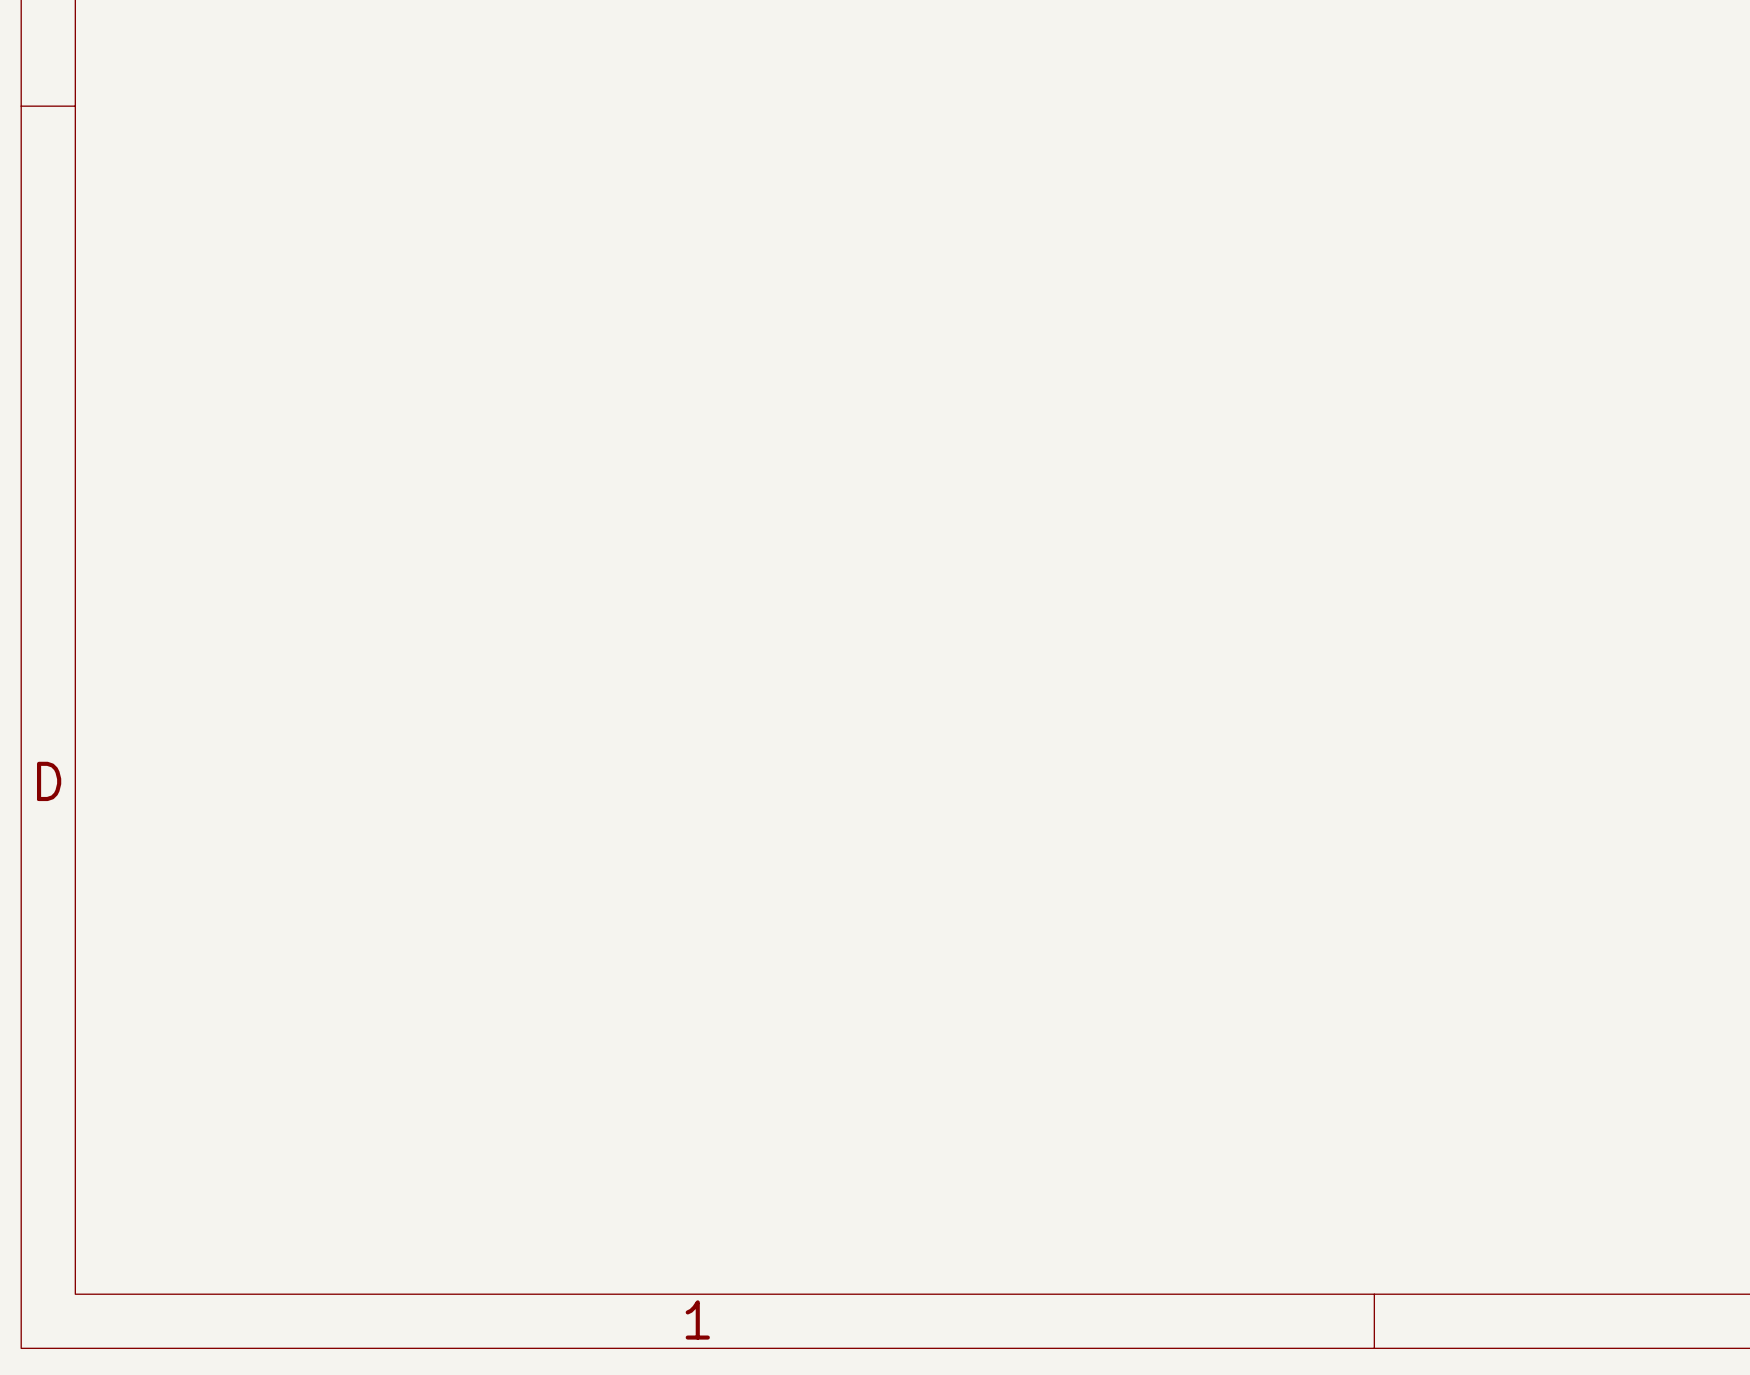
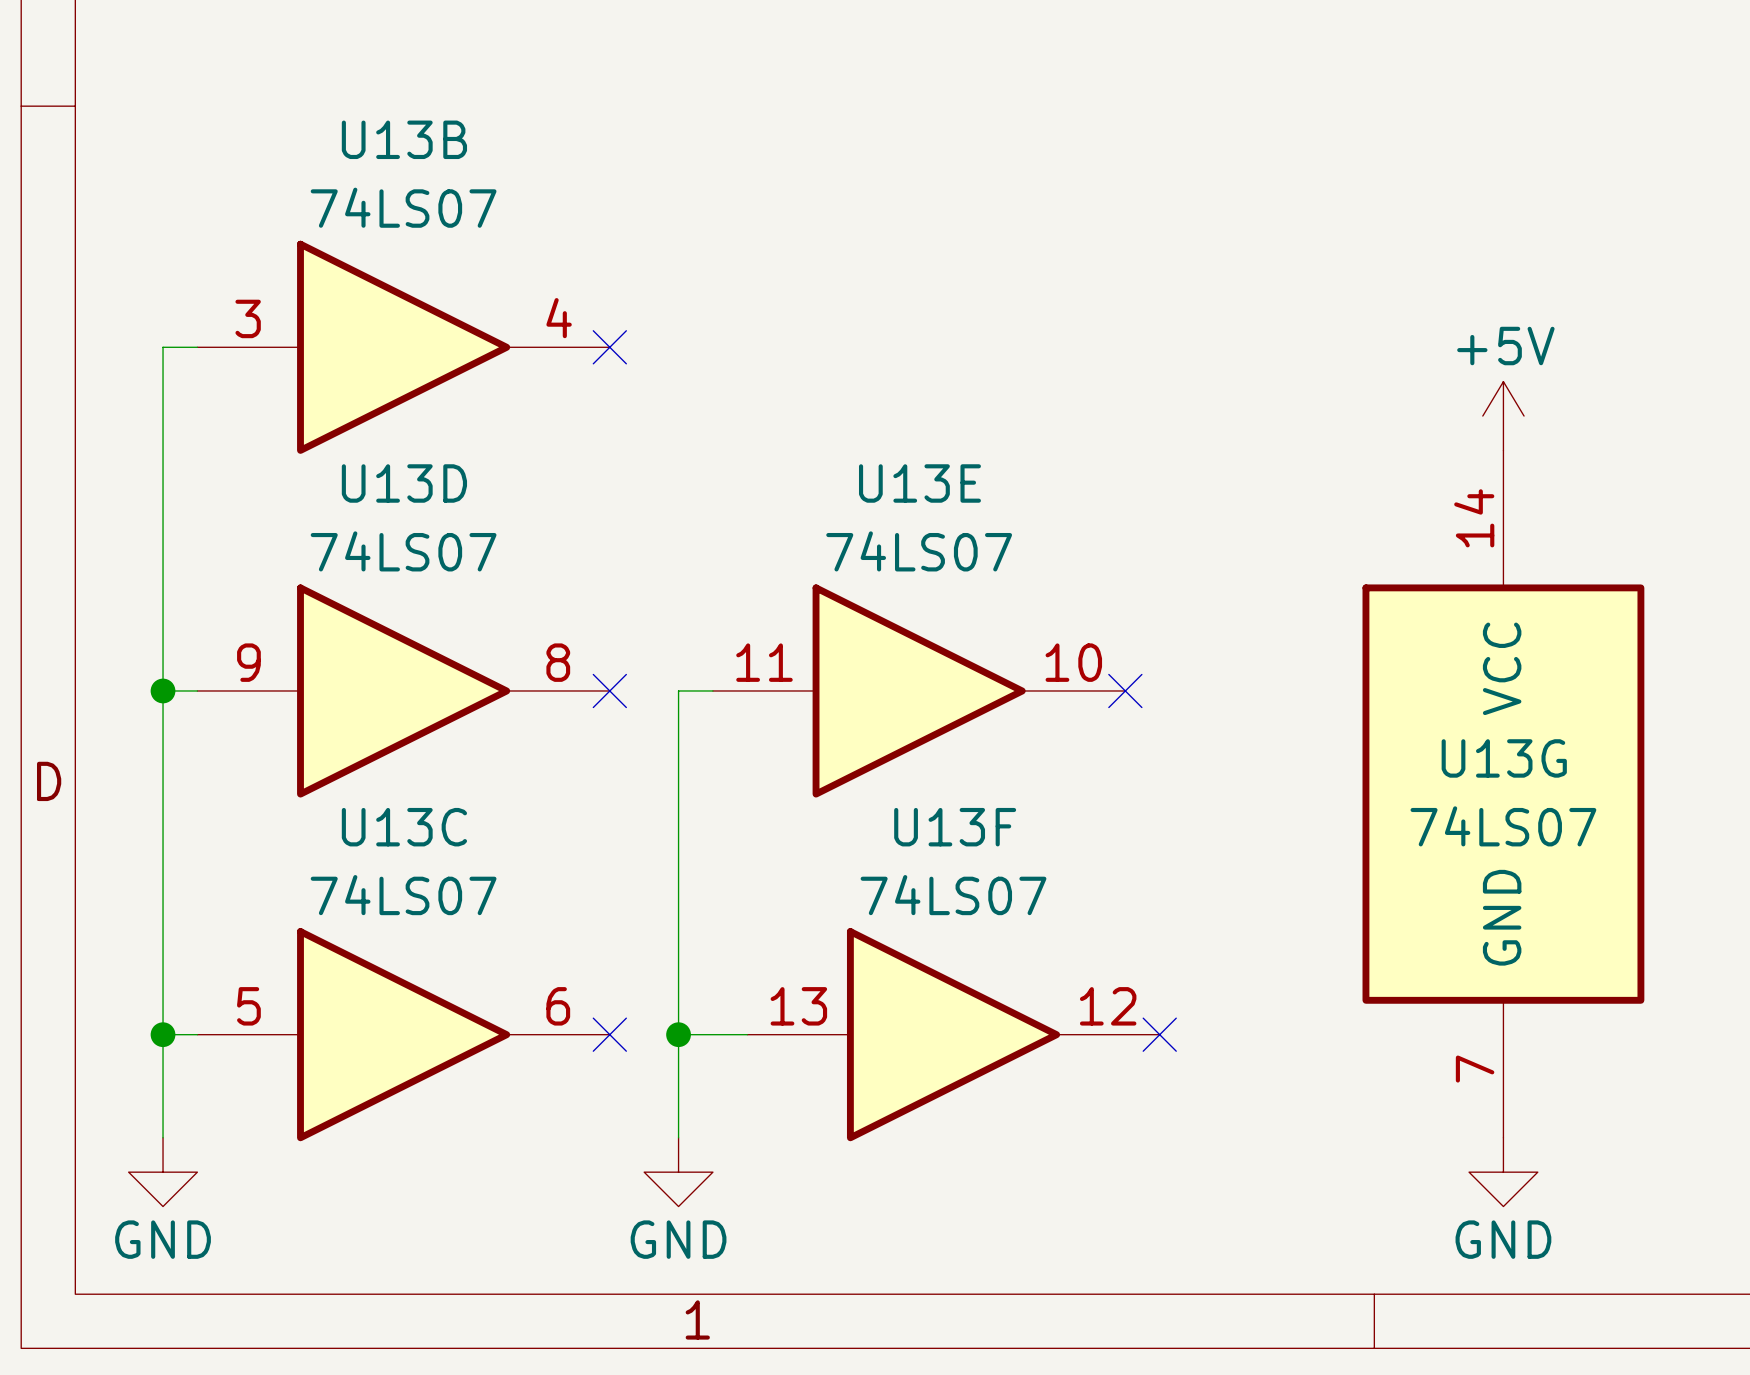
wire: none -> (197, 347) (163, 347) (163, 1137)
U13B: none -> 74LS07 (403, 347)
no-connect mark: none -> (609, 347)
power symbol: none -> +5V (1503, 416)
wire: none -> (163, 690) (197, 690)
junction: none -> (163, 690)
U13D: none -> 74LS07 (403, 690)
no-connect mark: none -> (609, 690)
wire: none -> (712, 690) (678, 690) (678, 1137)
U13E: none -> 74LS07 (919, 690)
no-connect mark: none -> (1125, 690)
U13G: none -> 74LS07 (1503, 794)
wire: none -> (163, 1034) (197, 1034)
junction: none -> (163, 1034)
U13C: none -> 74LS07 (403, 1034)
no-connect mark: none -> (609, 1034)
wire: none -> (678, 1034) (747, 1034)
junction: none -> (678, 1034)
U13F: none -> 74LS07 (953, 1034)
no-connect mark: none -> (1159, 1034)
power symbol: none -> GND (163, 1172)
power symbol: none -> GND (678, 1172)
power symbol: none -> GND (1503, 1172)

